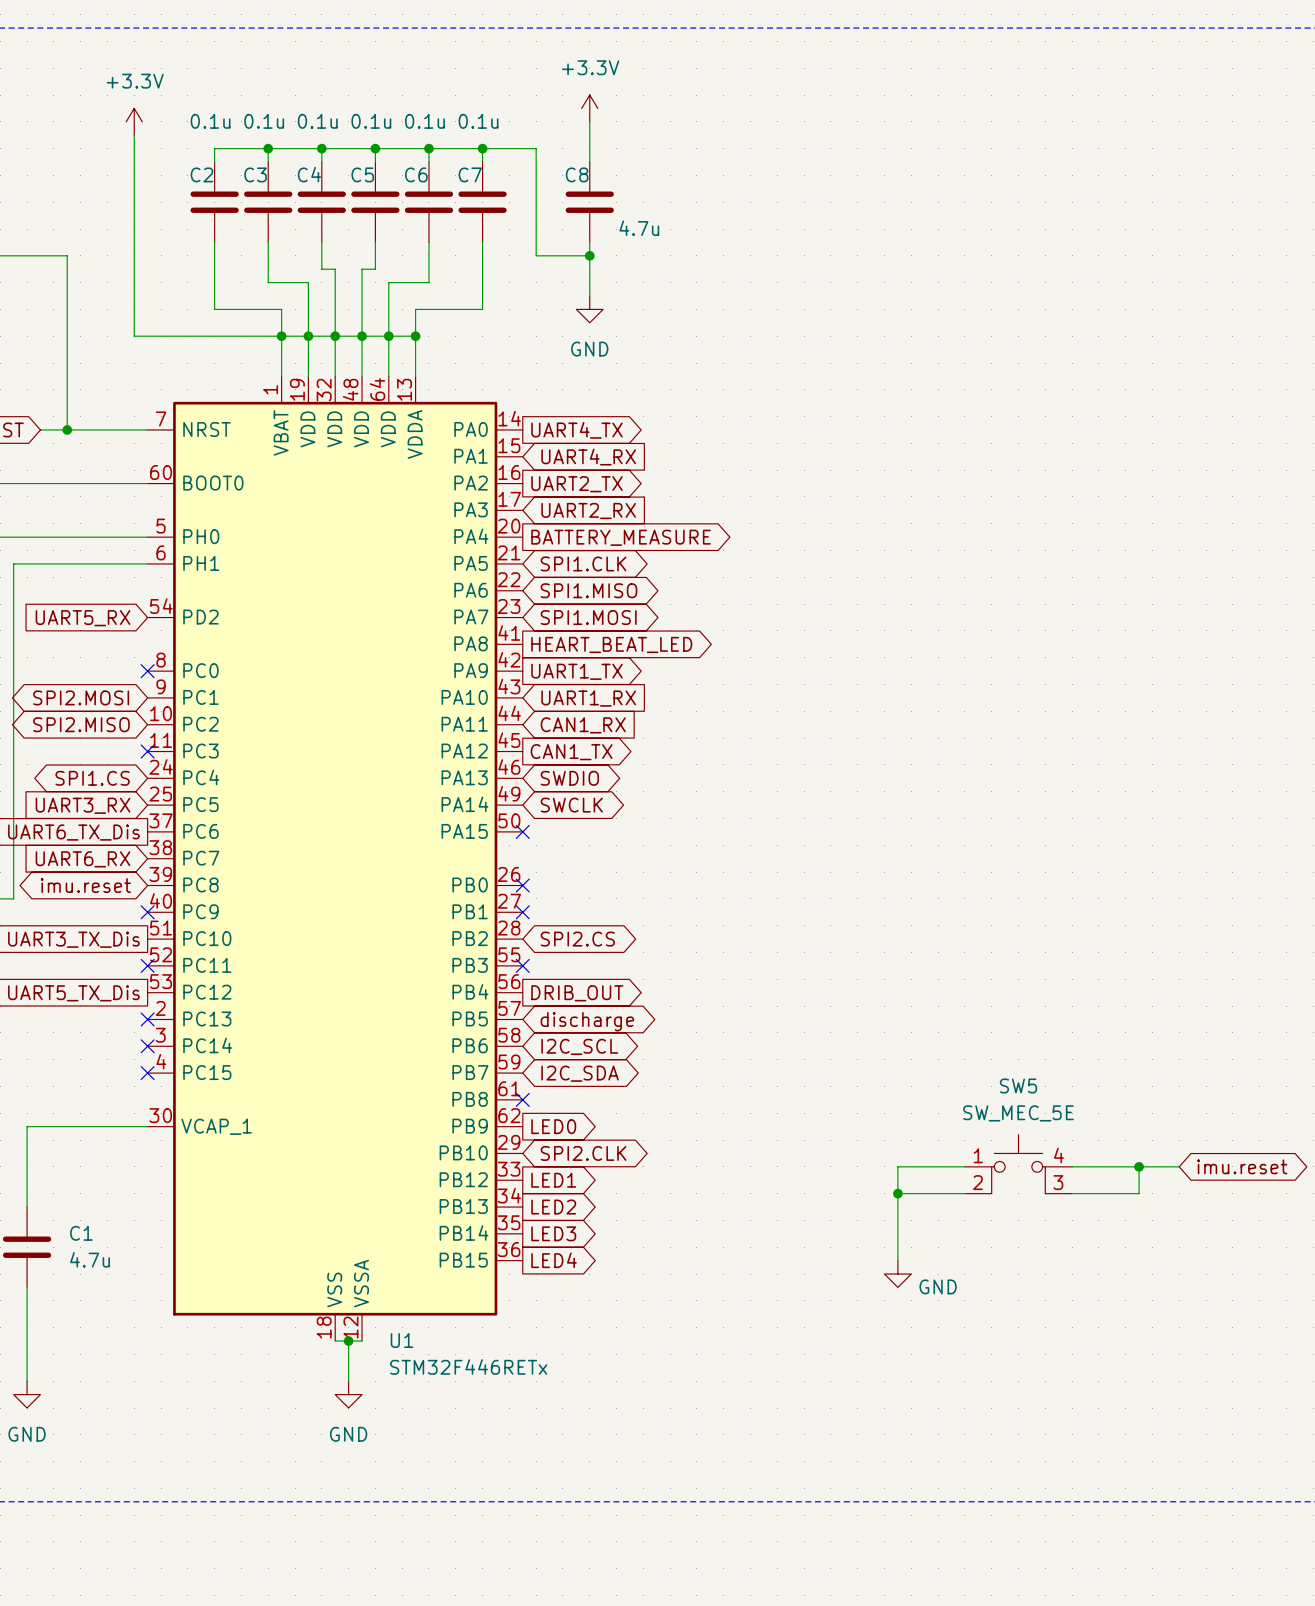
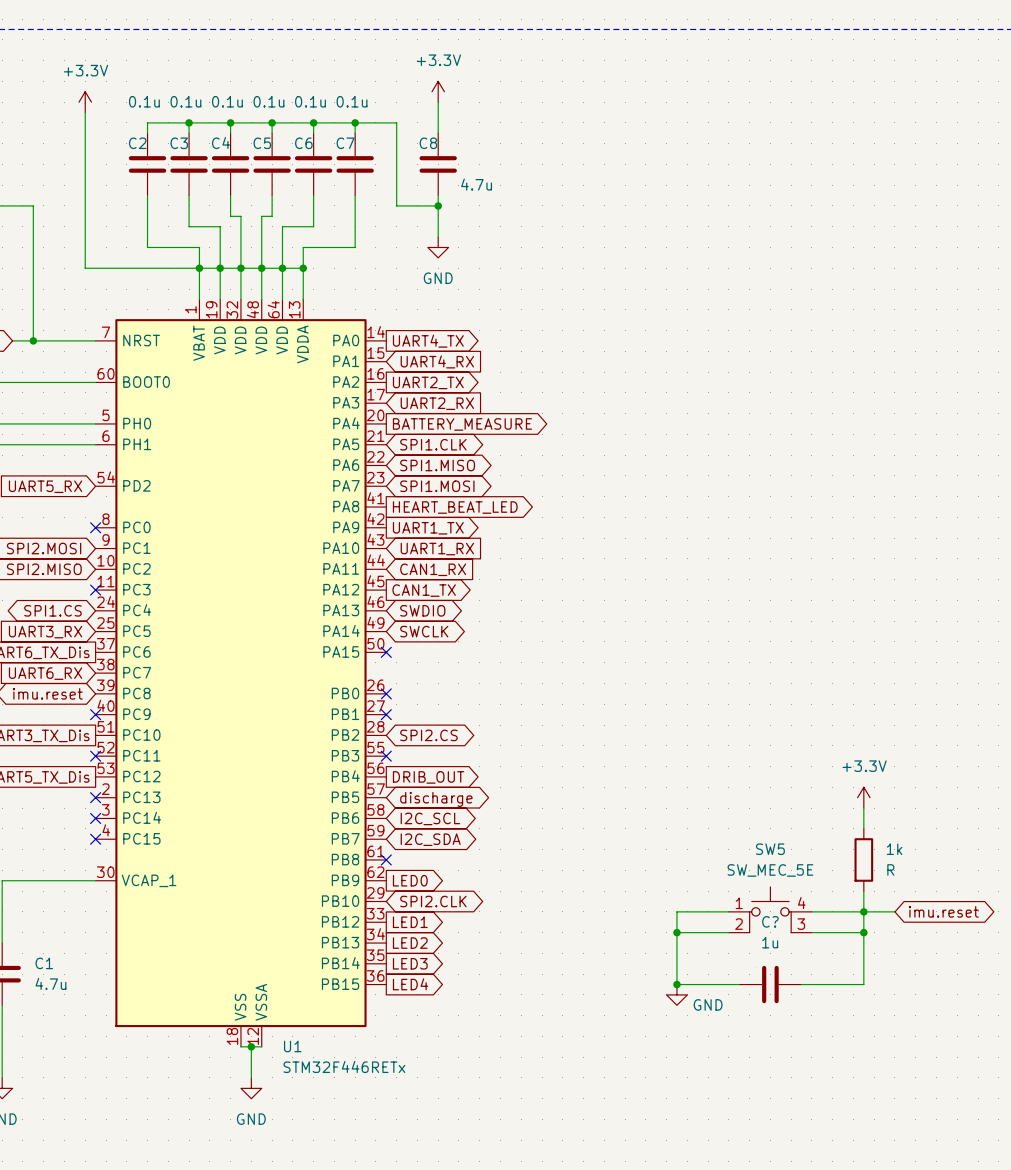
power symbol: none -> +3.3V (863, 797)
wire: none -> (863, 808) (863, 828)
1k: none -> R (863, 859)
wire: none -> (863, 891) (863, 911)
wire: none -> (863, 932) (863, 984) (801, 984)
junction: none -> (863, 932)
wire: none -> (676, 984) (739, 984)
junction: none -> (676, 984)
C?: none -> 1u (770, 984)

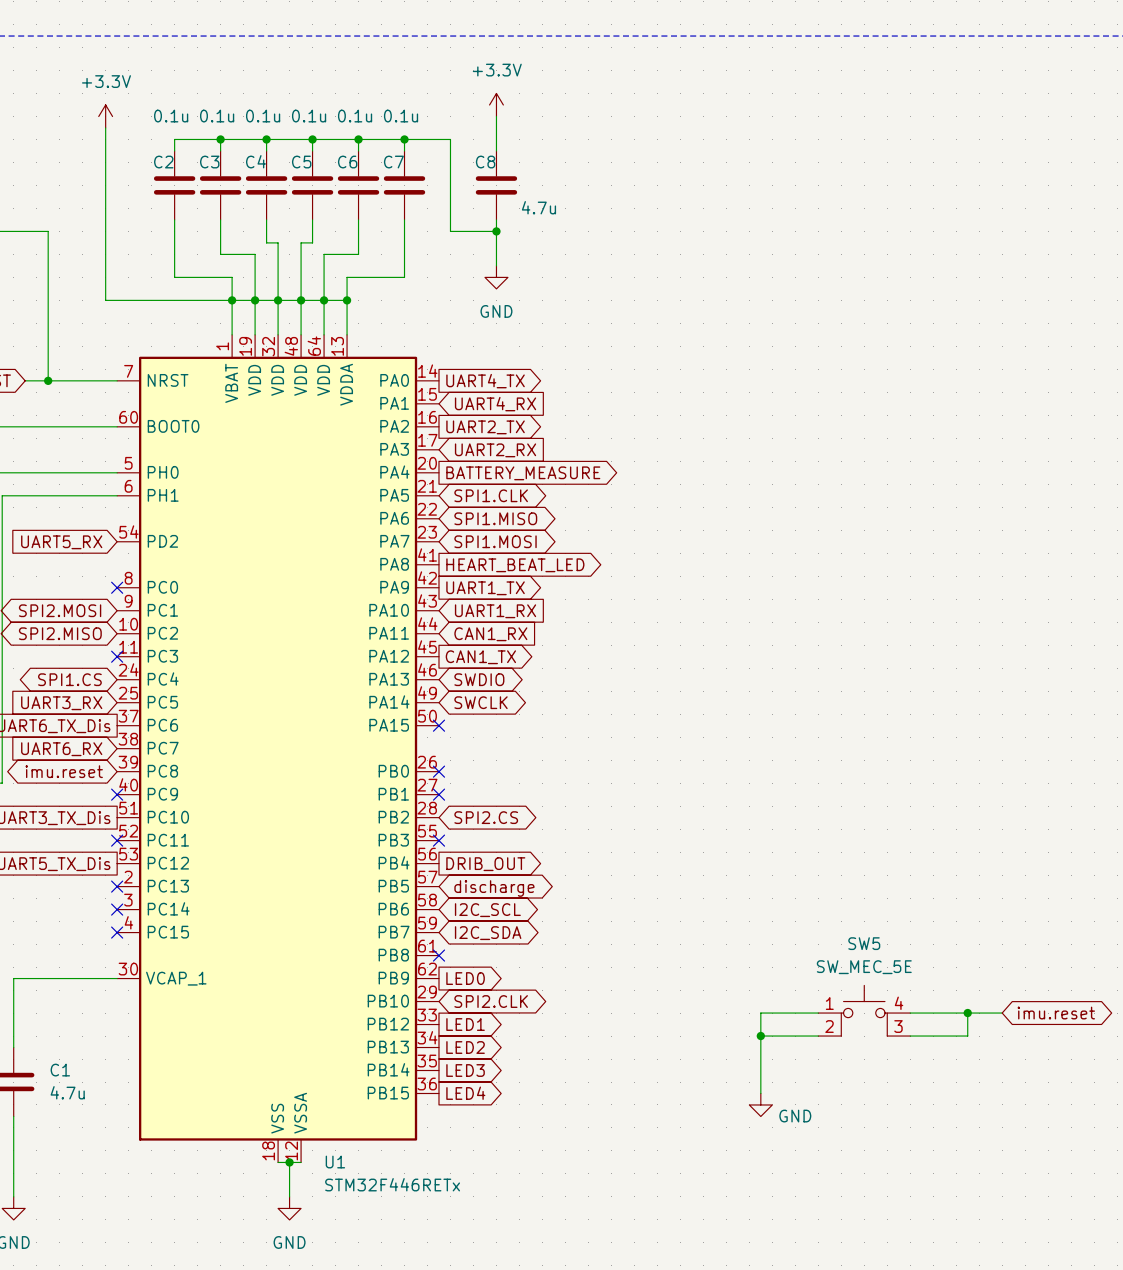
power symbol: +3.3V (863, 797) -> none
wire: (863, 808) (863, 828) -> none
1k: R (863, 859) -> none
wire: (863, 891) (863, 911) -> none
wire: (863, 932) (863, 984) (801, 984) -> none
junction: (863, 932) -> none
wire: (676, 984) (739, 984) -> none
junction: (676, 984) -> none
C?: 1u (770, 984) -> none

